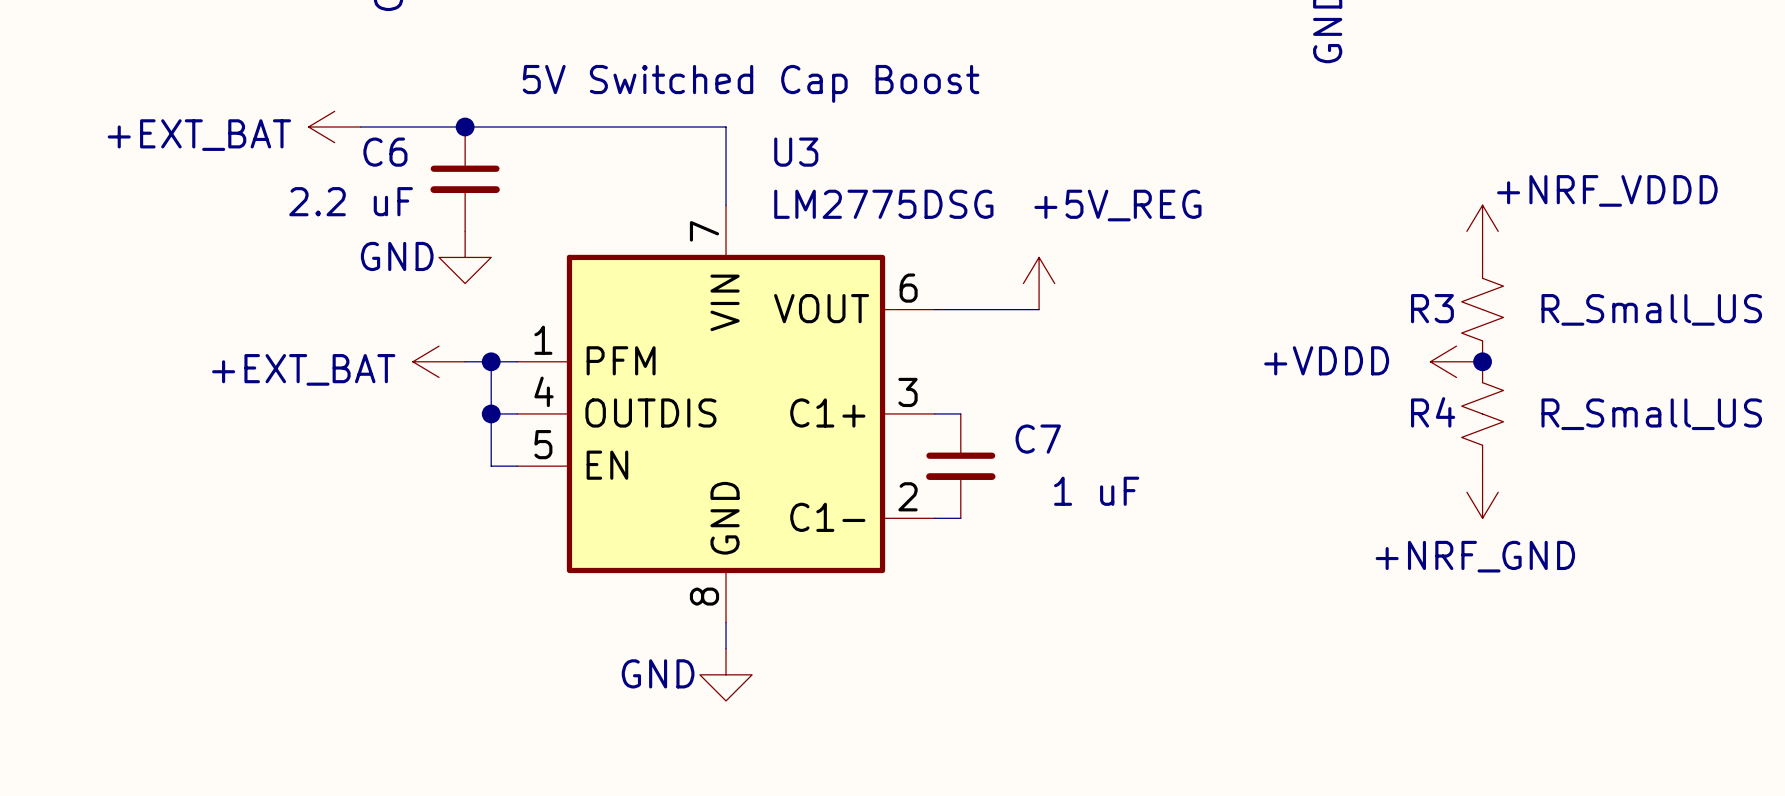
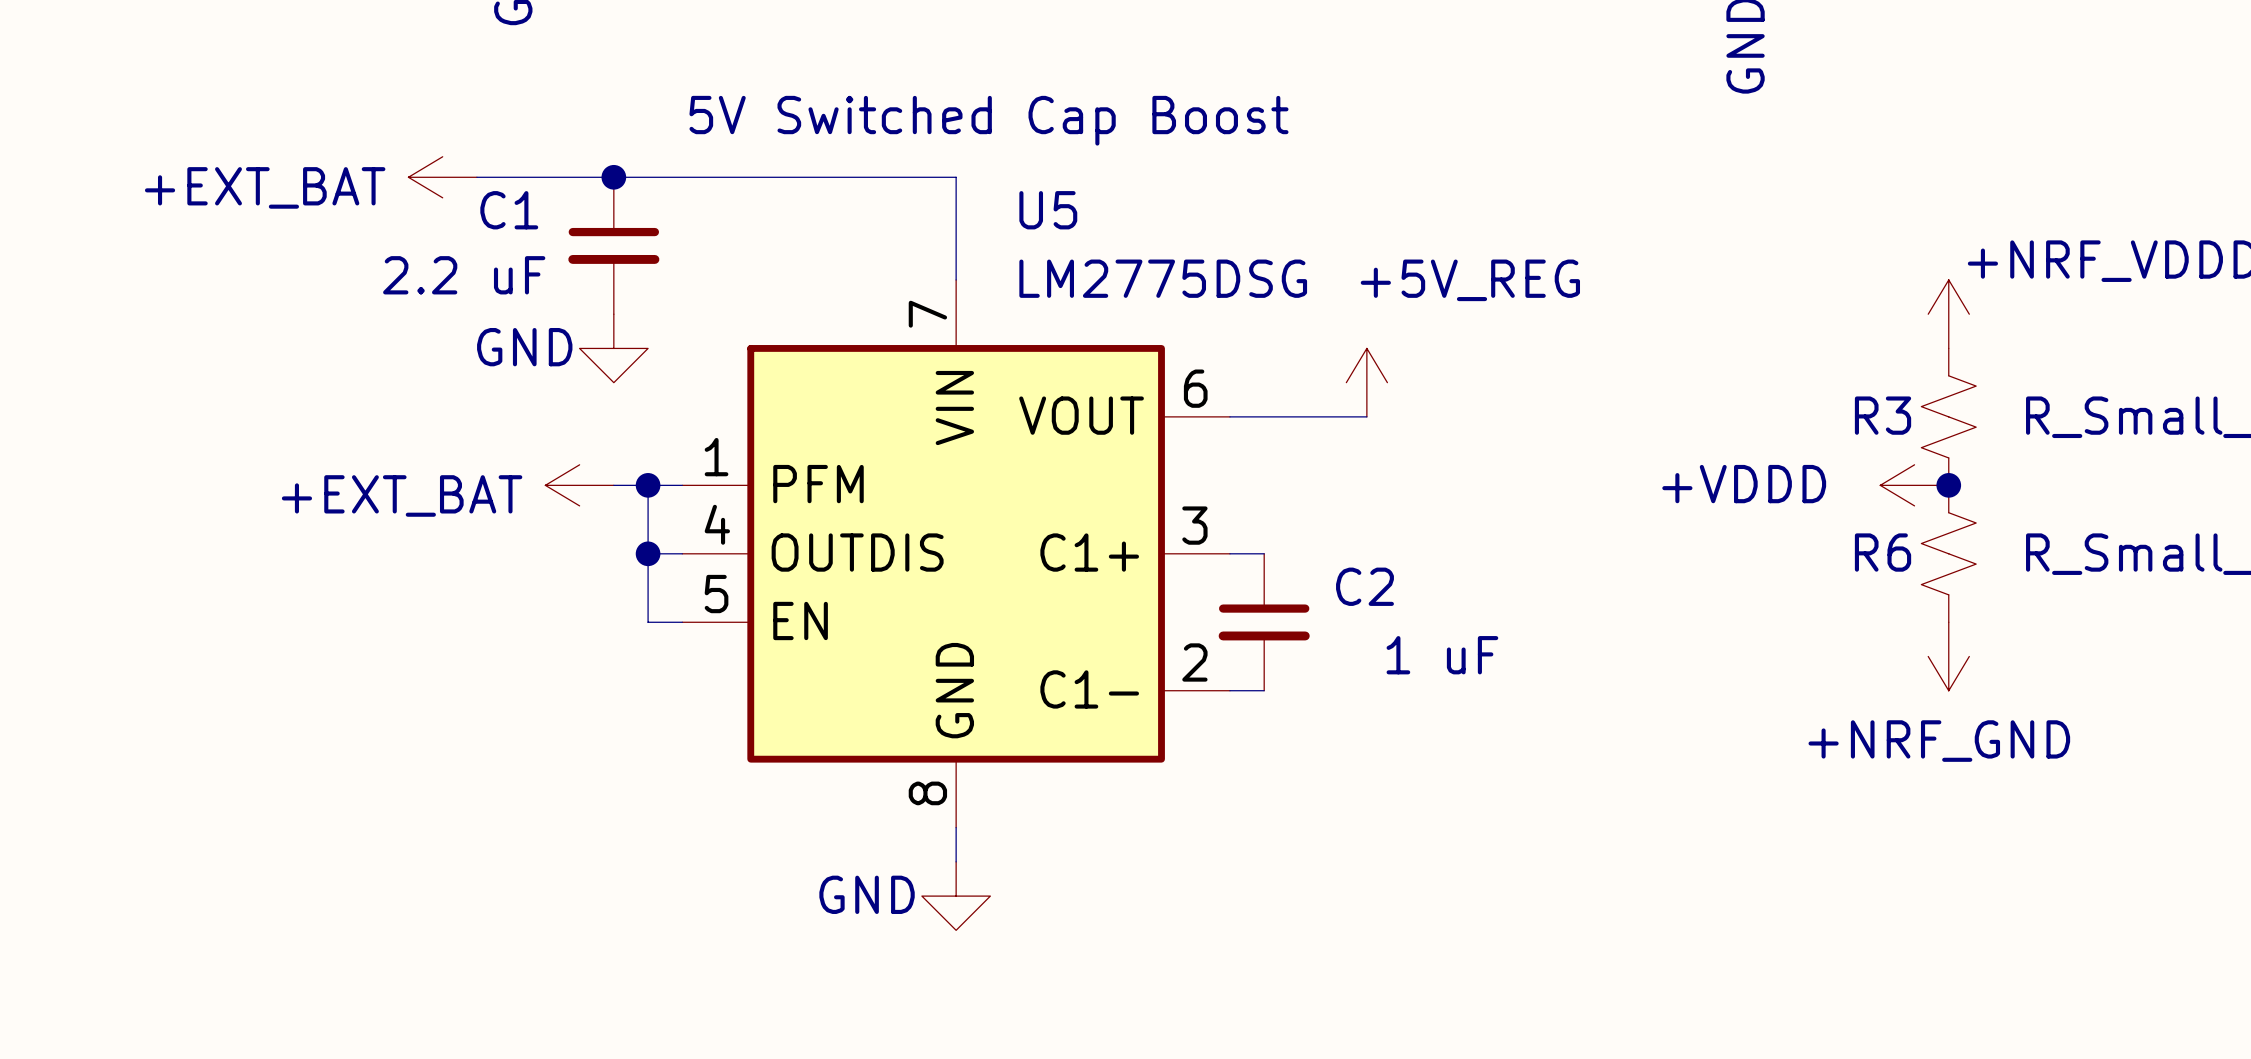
C6 name: C6 (385, 152) -> C1 (509, 210)
U3 name: U3 (796, 152) -> U5 (1048, 210)
R4 name: R4 (1433, 412) -> R6 (1883, 552)
C7 name: C7 (1038, 439) -> C2 (1364, 586)

